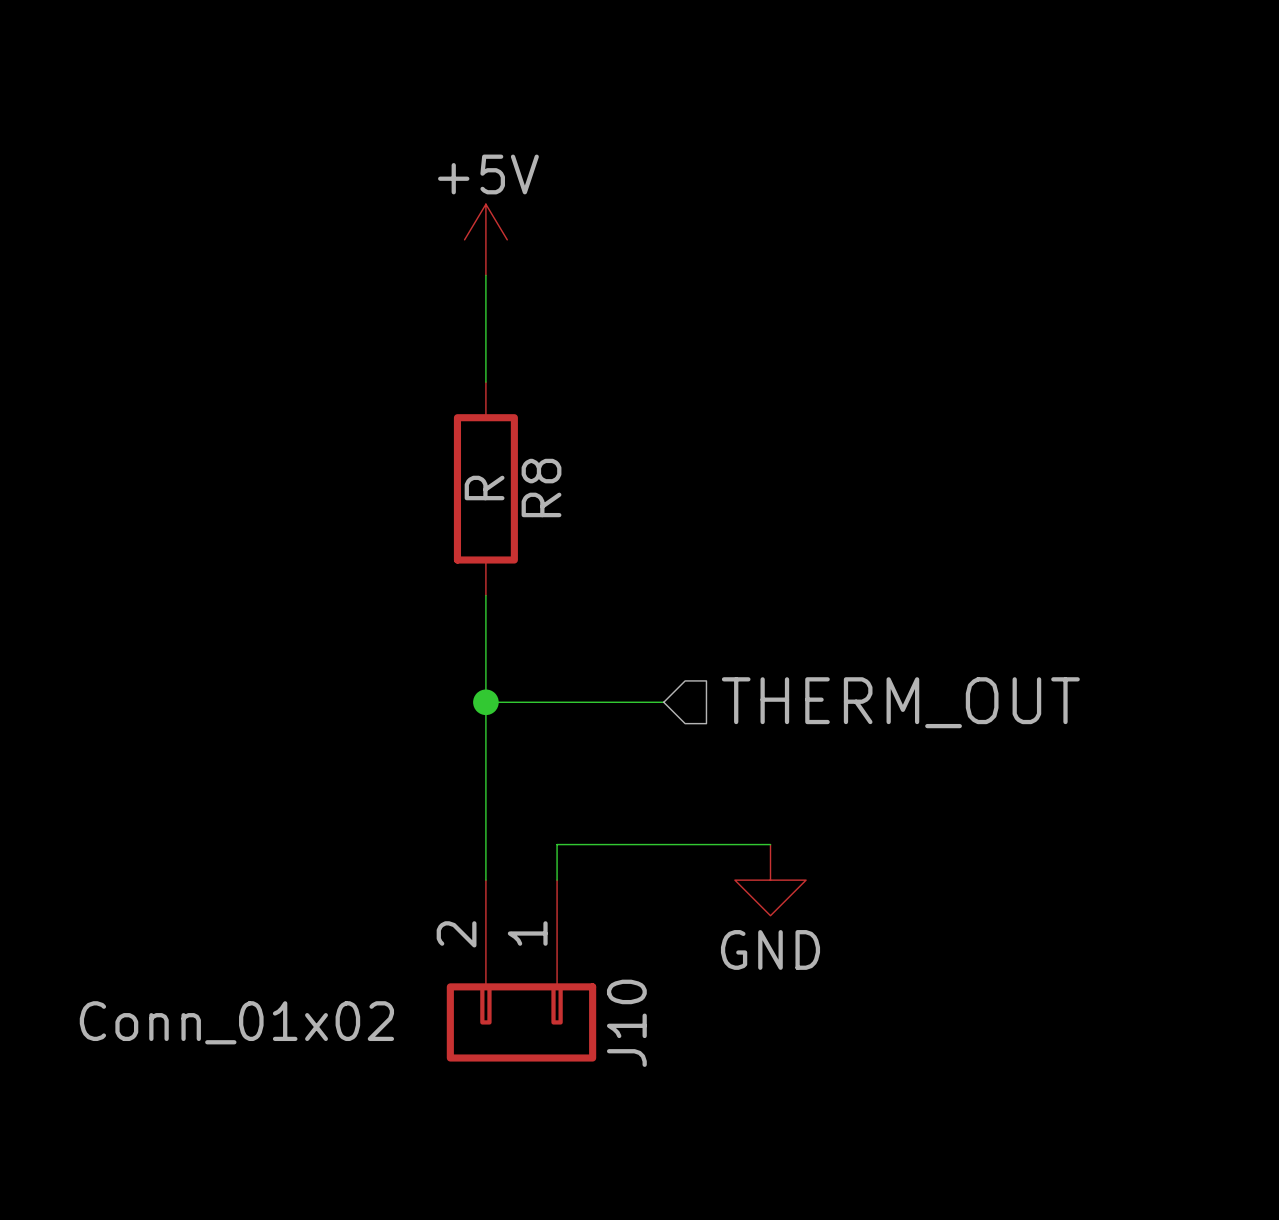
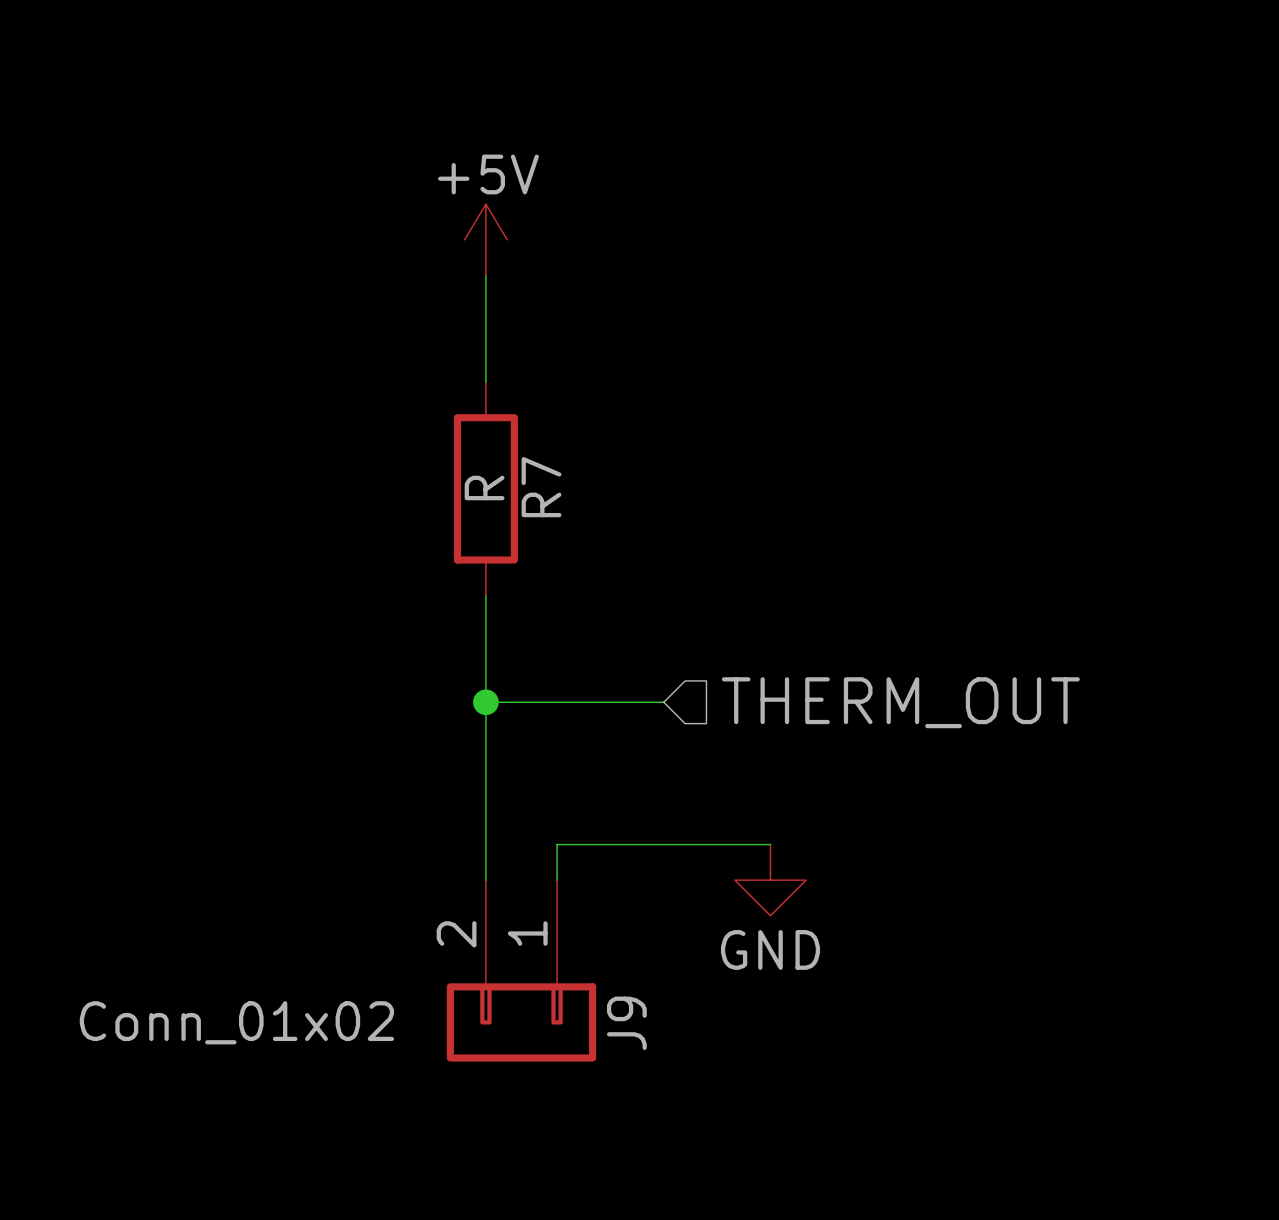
R8 name: R8 (541, 488) -> R7 (541, 487)
J10 name: J10 (626, 1023) -> J9 (626, 1023)

